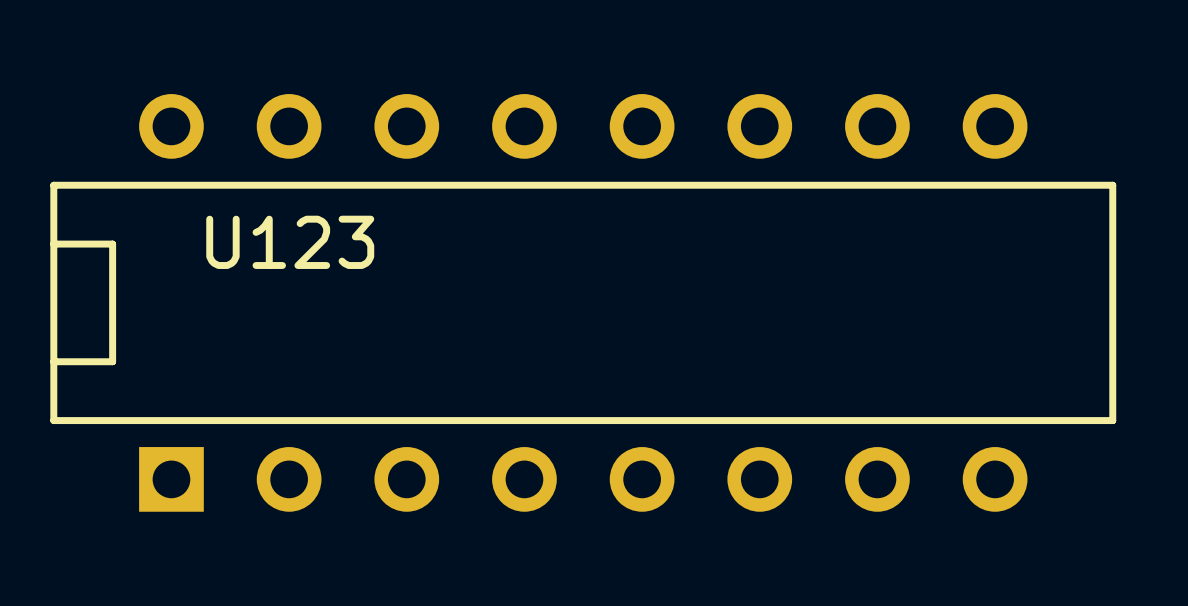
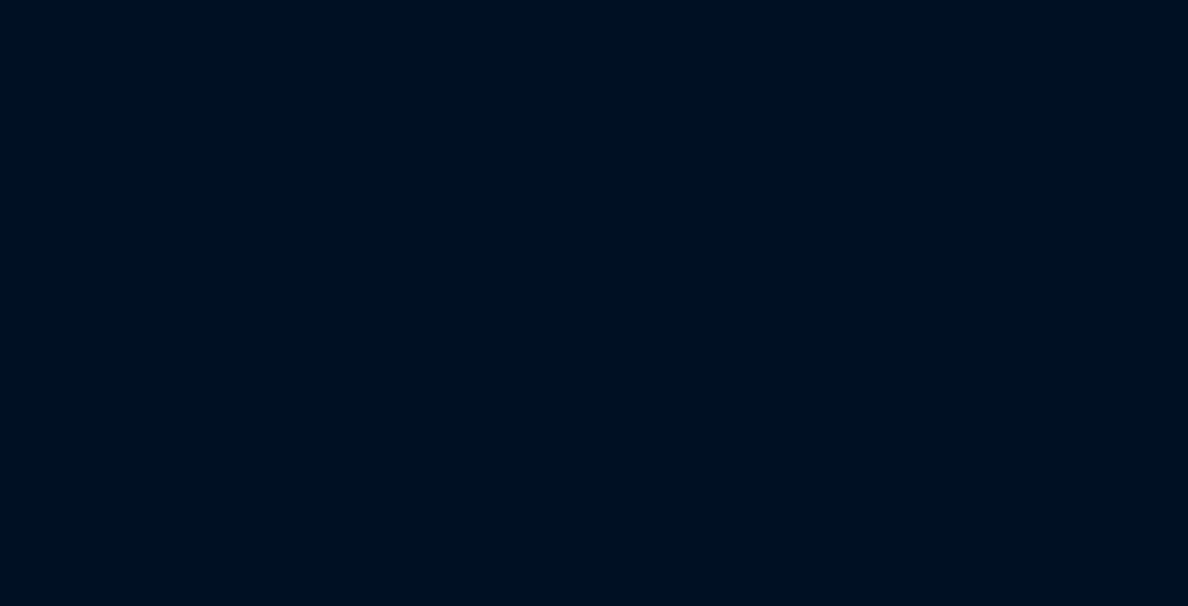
U123: (583, 302) -> none

